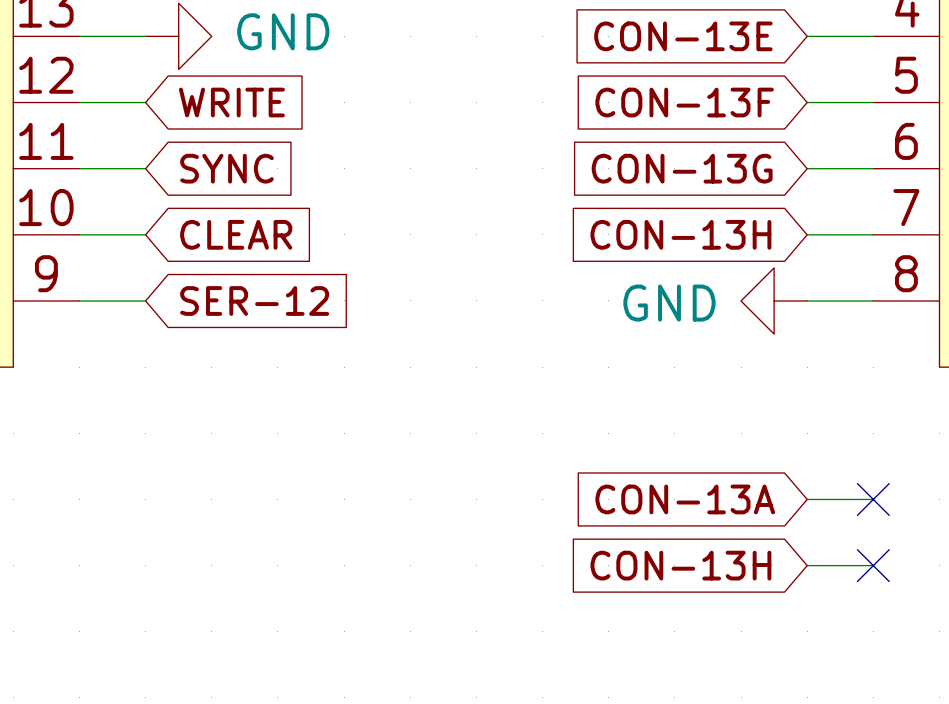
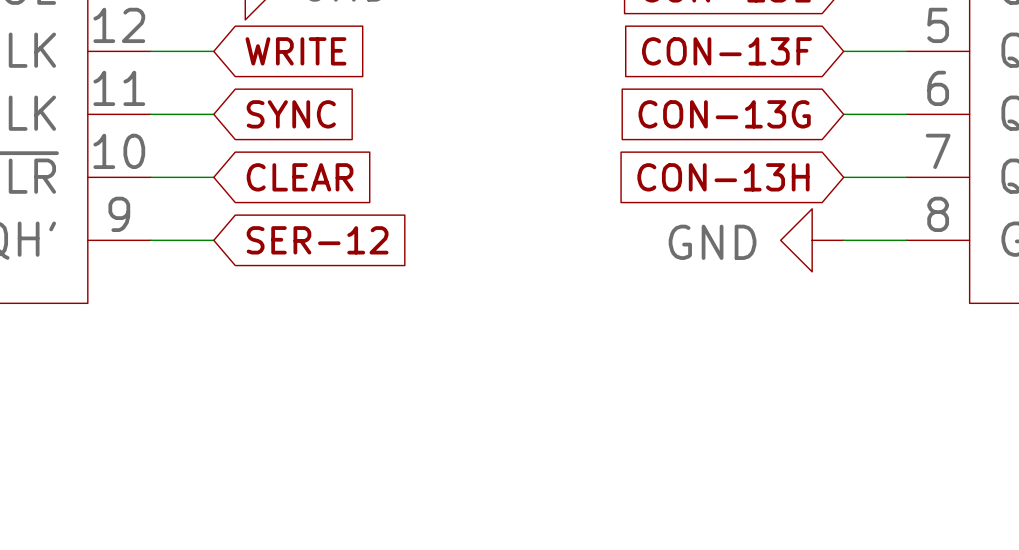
global label: CON-13A (685, 499) -> none
wire: (807, 499) (873, 499) -> none
no-connect mark: (873, 499) -> none
global label: CON-13H (680, 565) -> none
wire: (807, 565) (873, 565) -> none
no-connect mark: (873, 565) -> none

